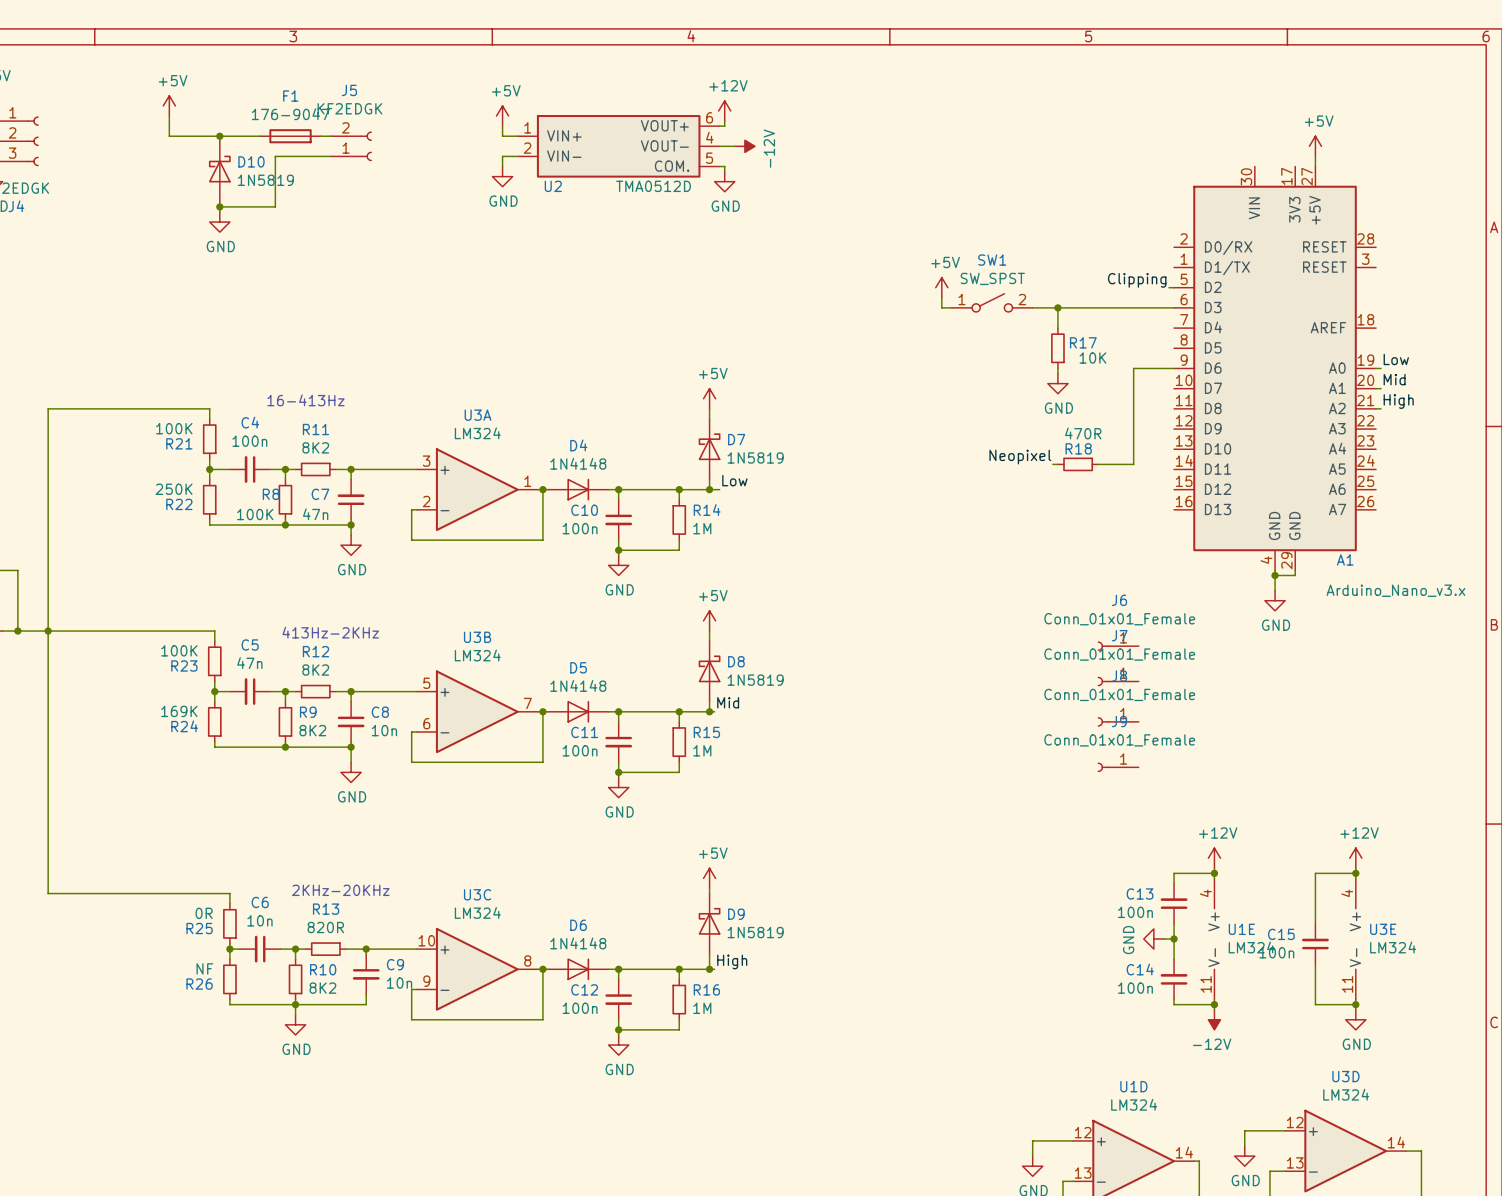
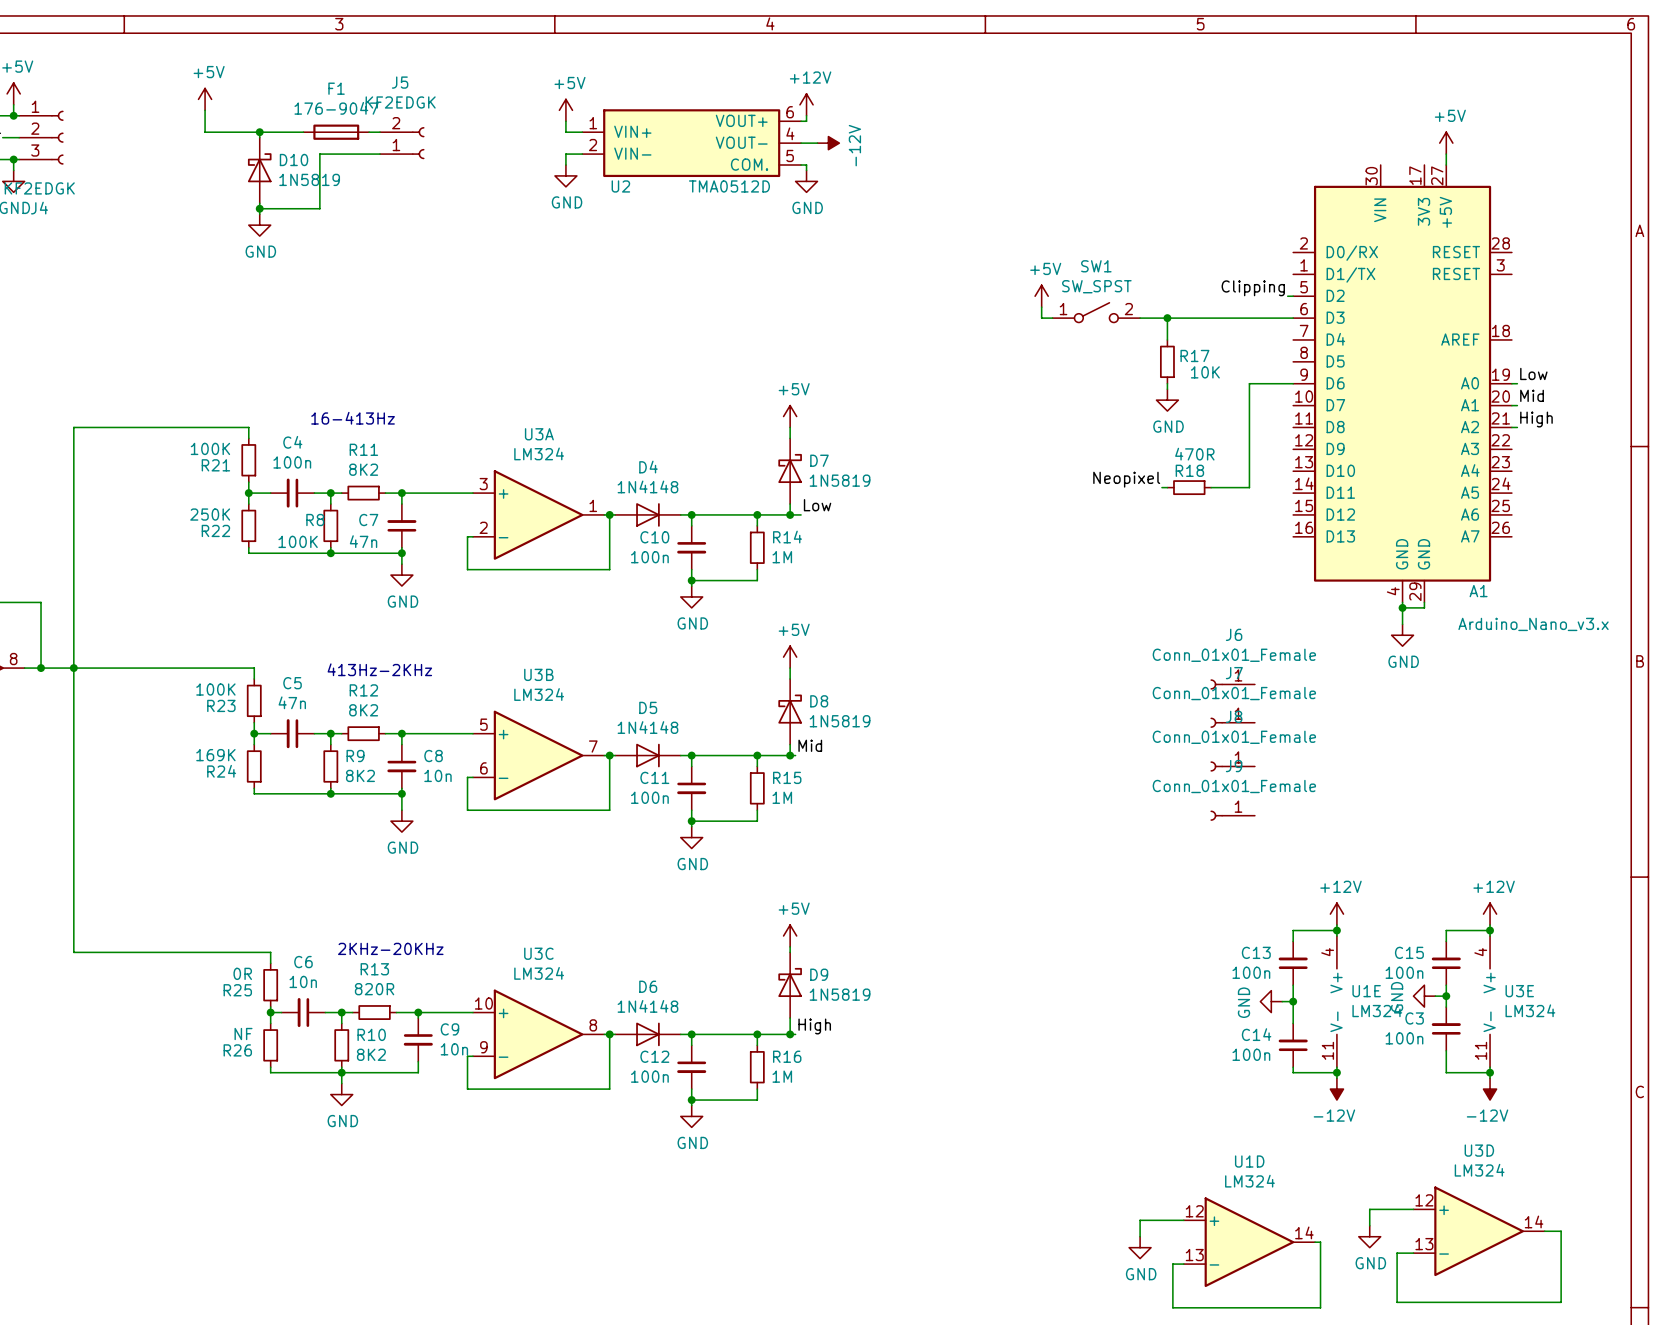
power symbol: none -> GND (1424, 996)
wire: none -> (1435, 996) (1446, 996)
junction: none -> (1446, 996)
C15 position: (1315, 944) -> (1446, 963)
C3: none -> 100n (1446, 1028)
power symbol: GND (1355, 1019) -> -12V (1490, 1089)

